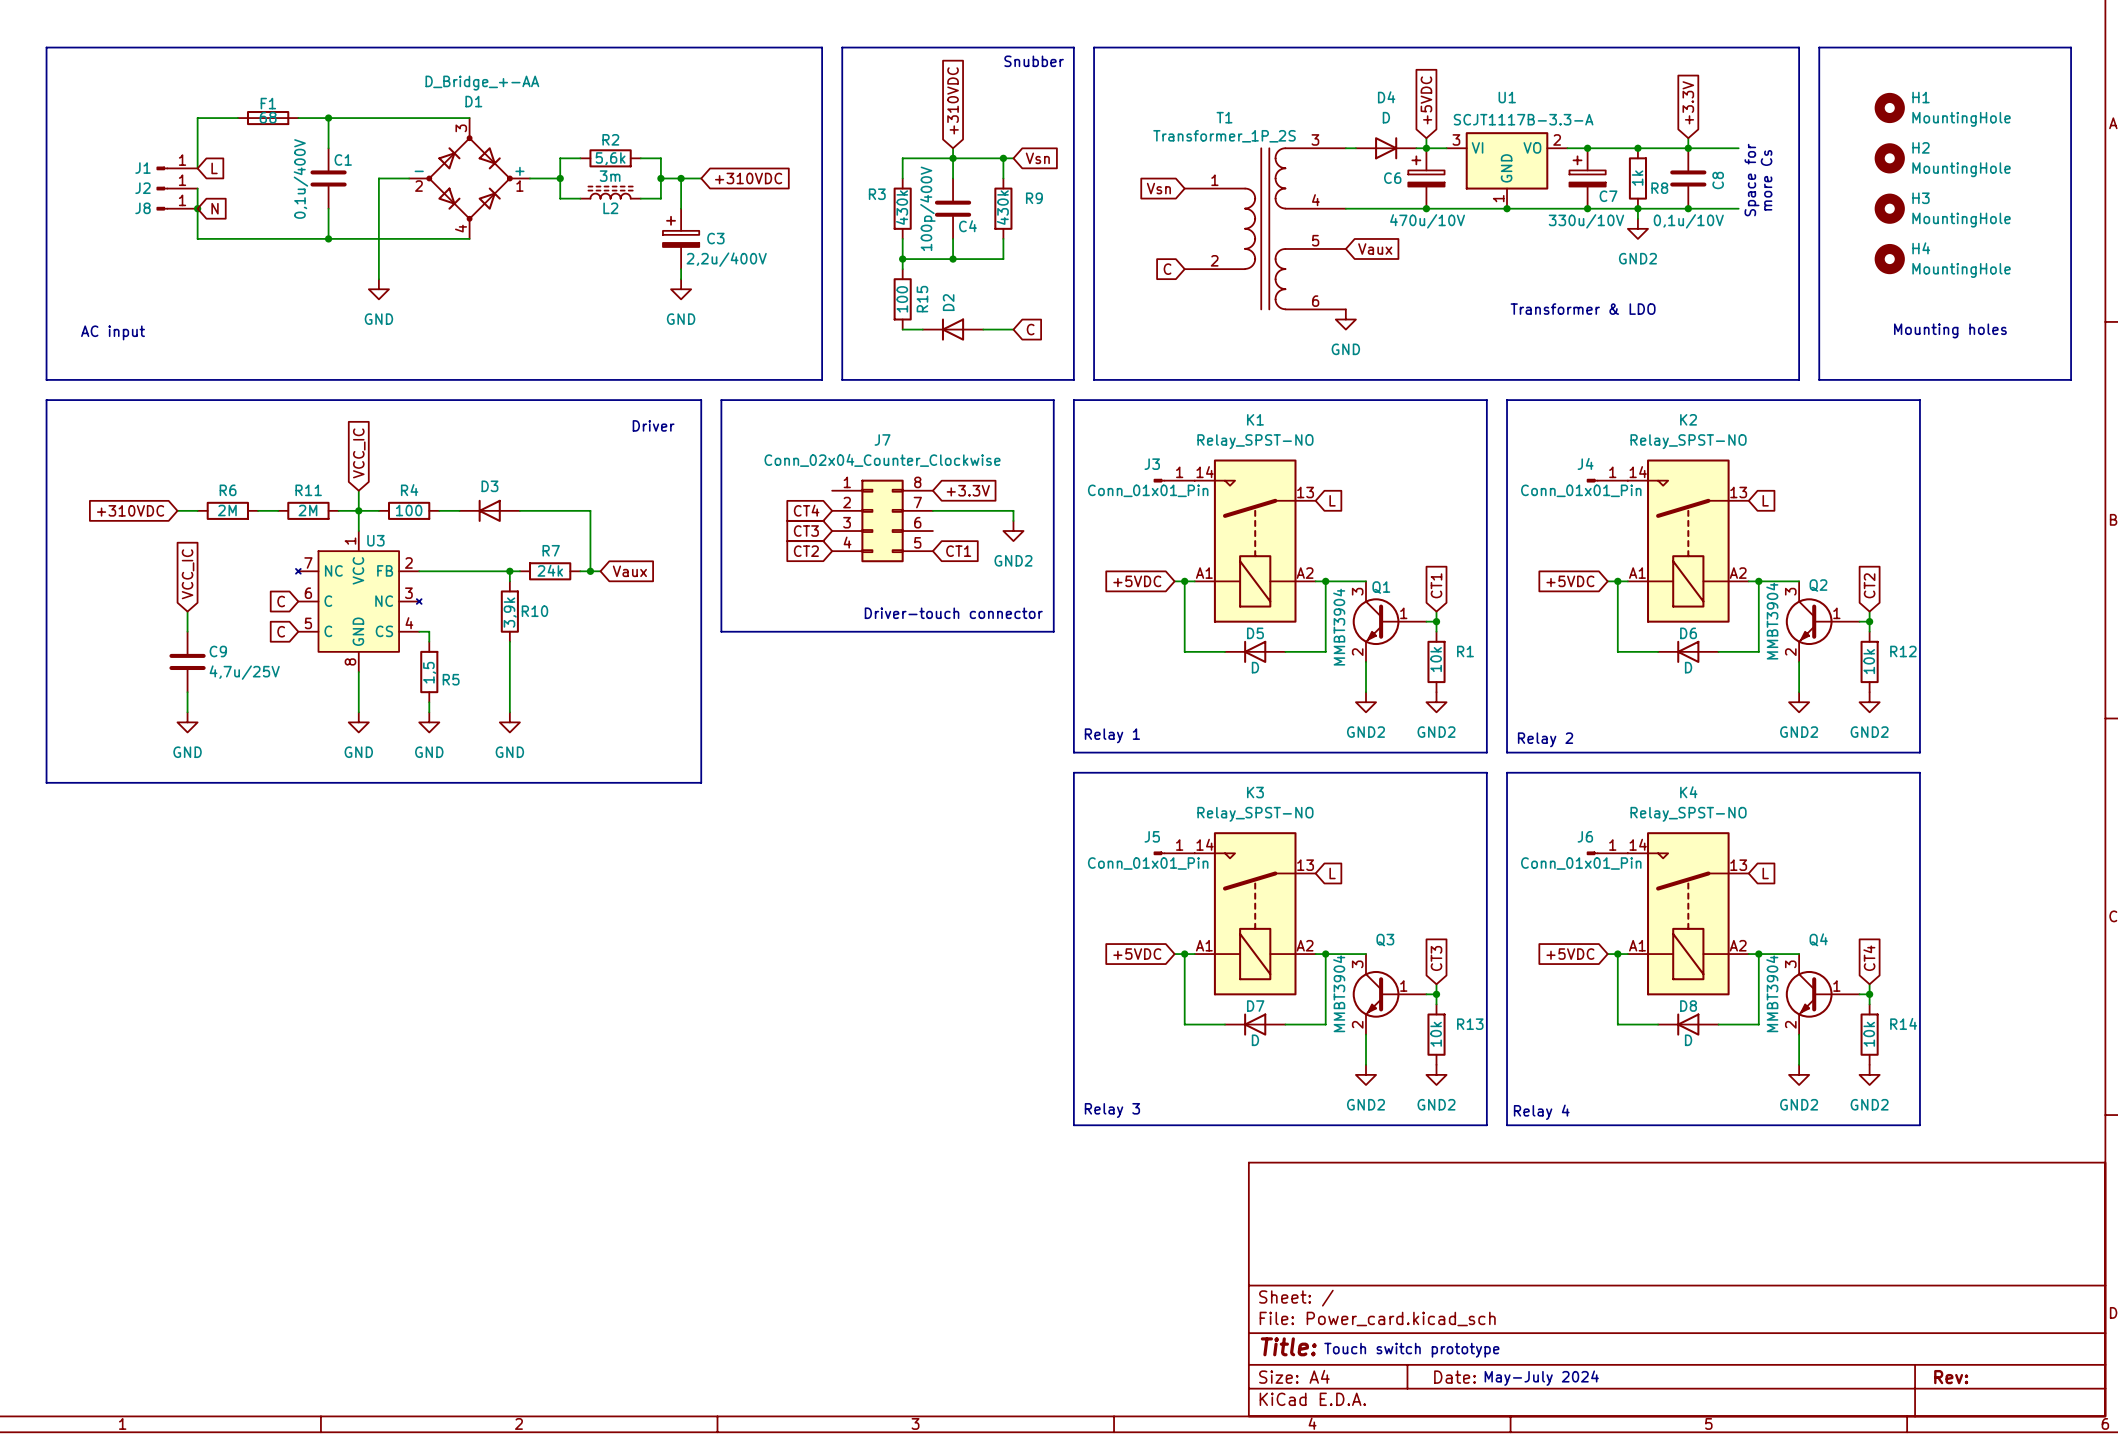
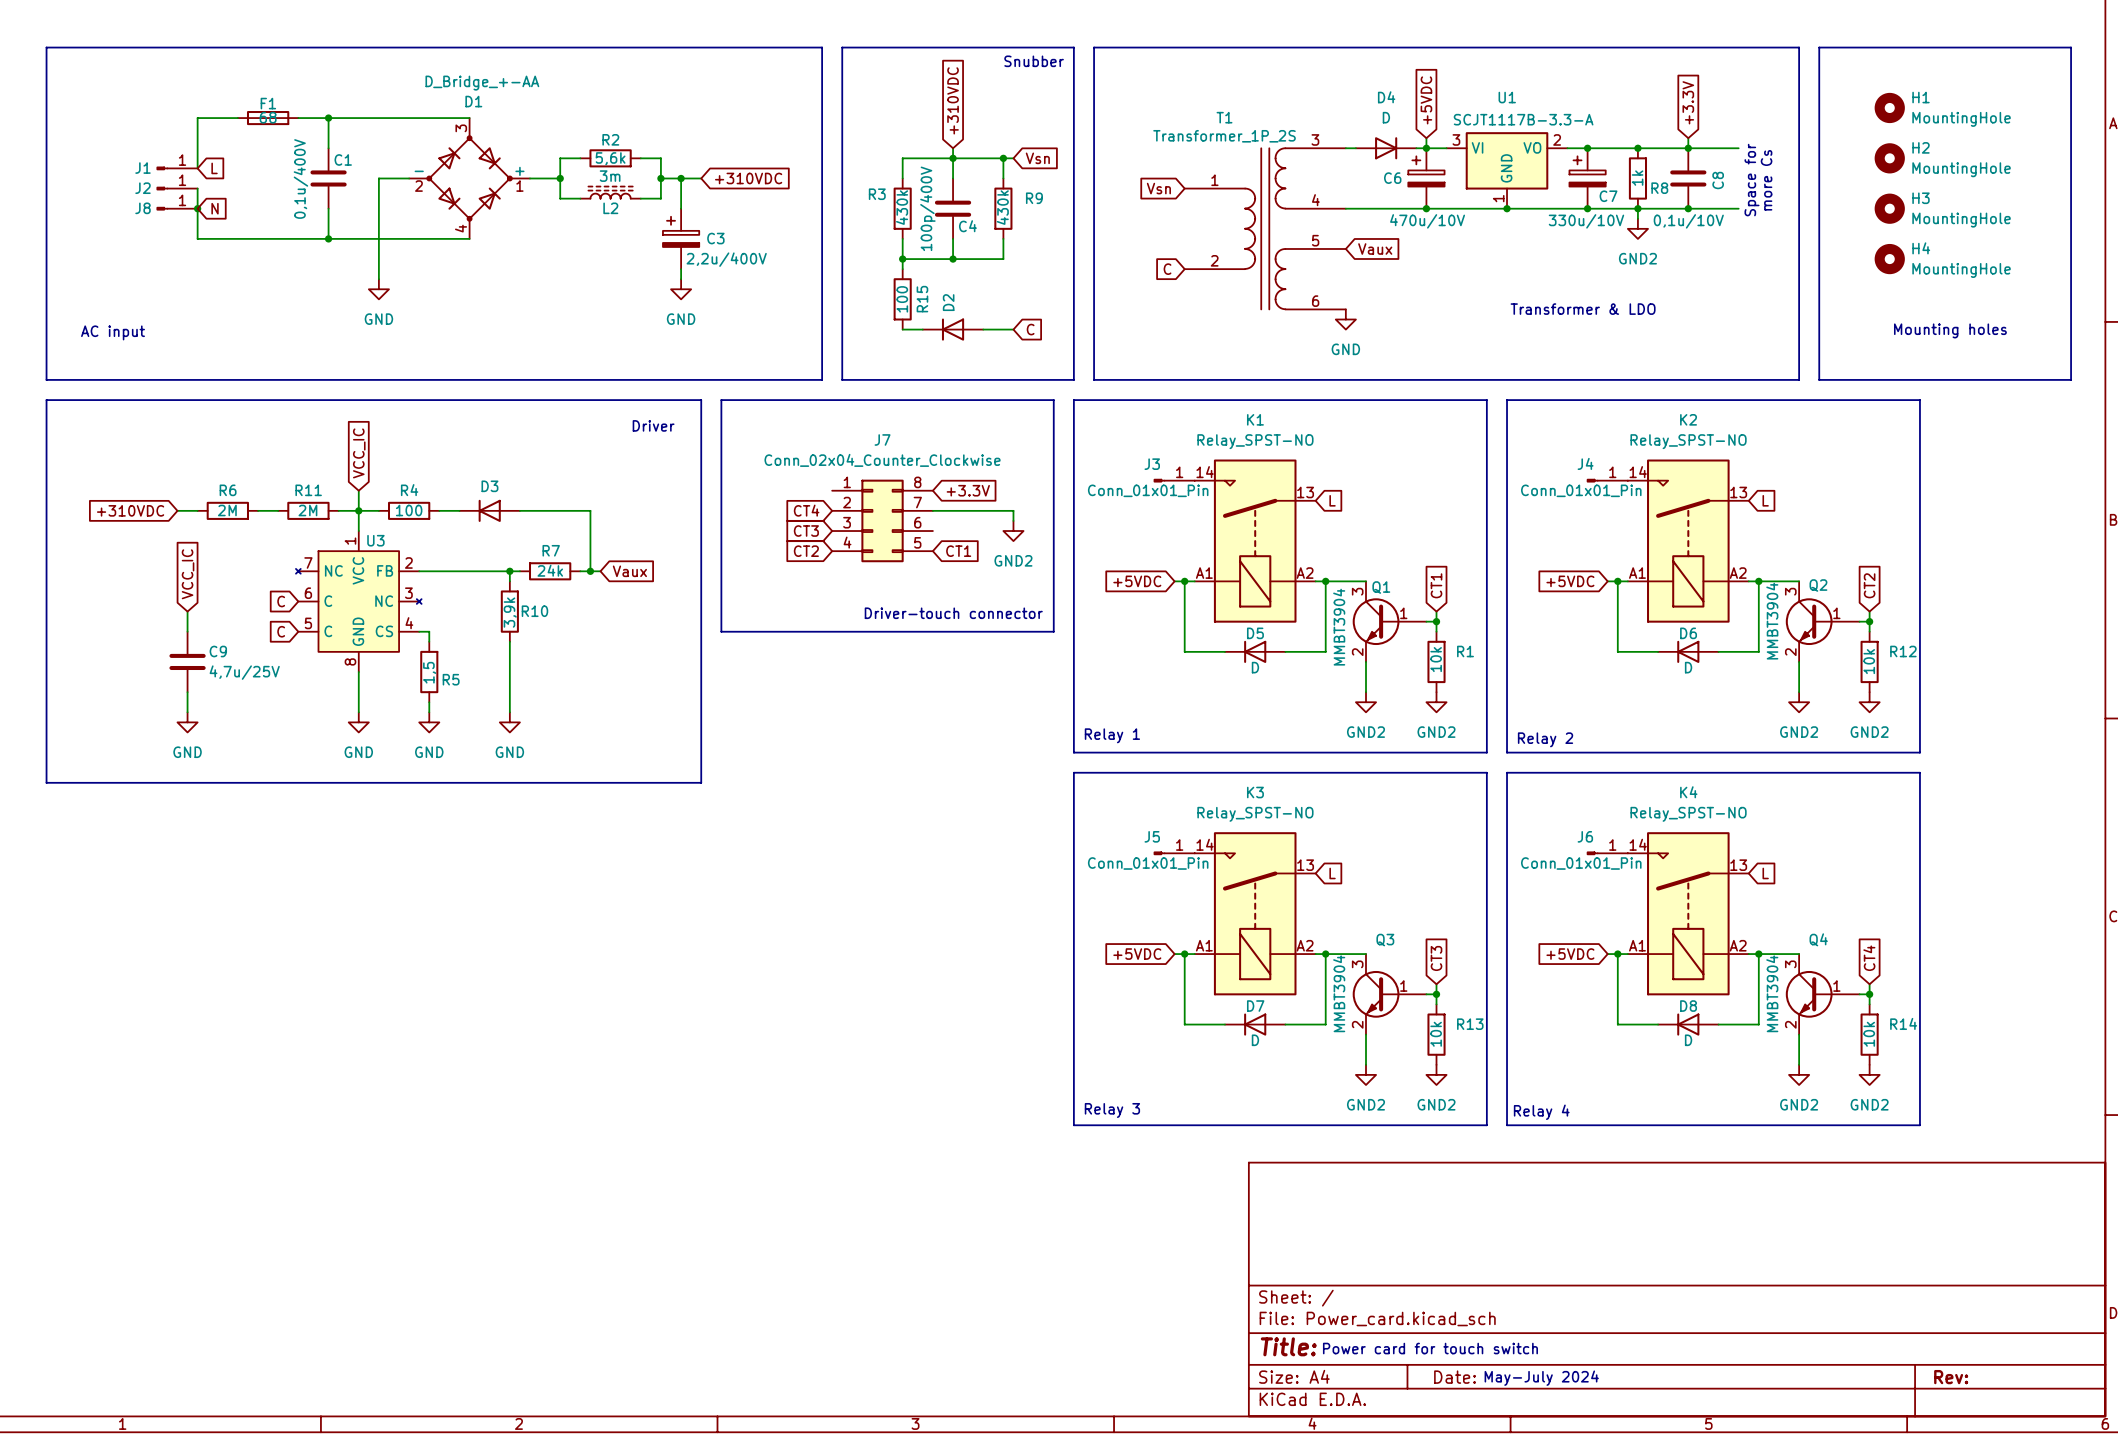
text: none -> Power card for touch switch (1430, 1348)
text: Touch switch prototype (1411, 1350) -> none

